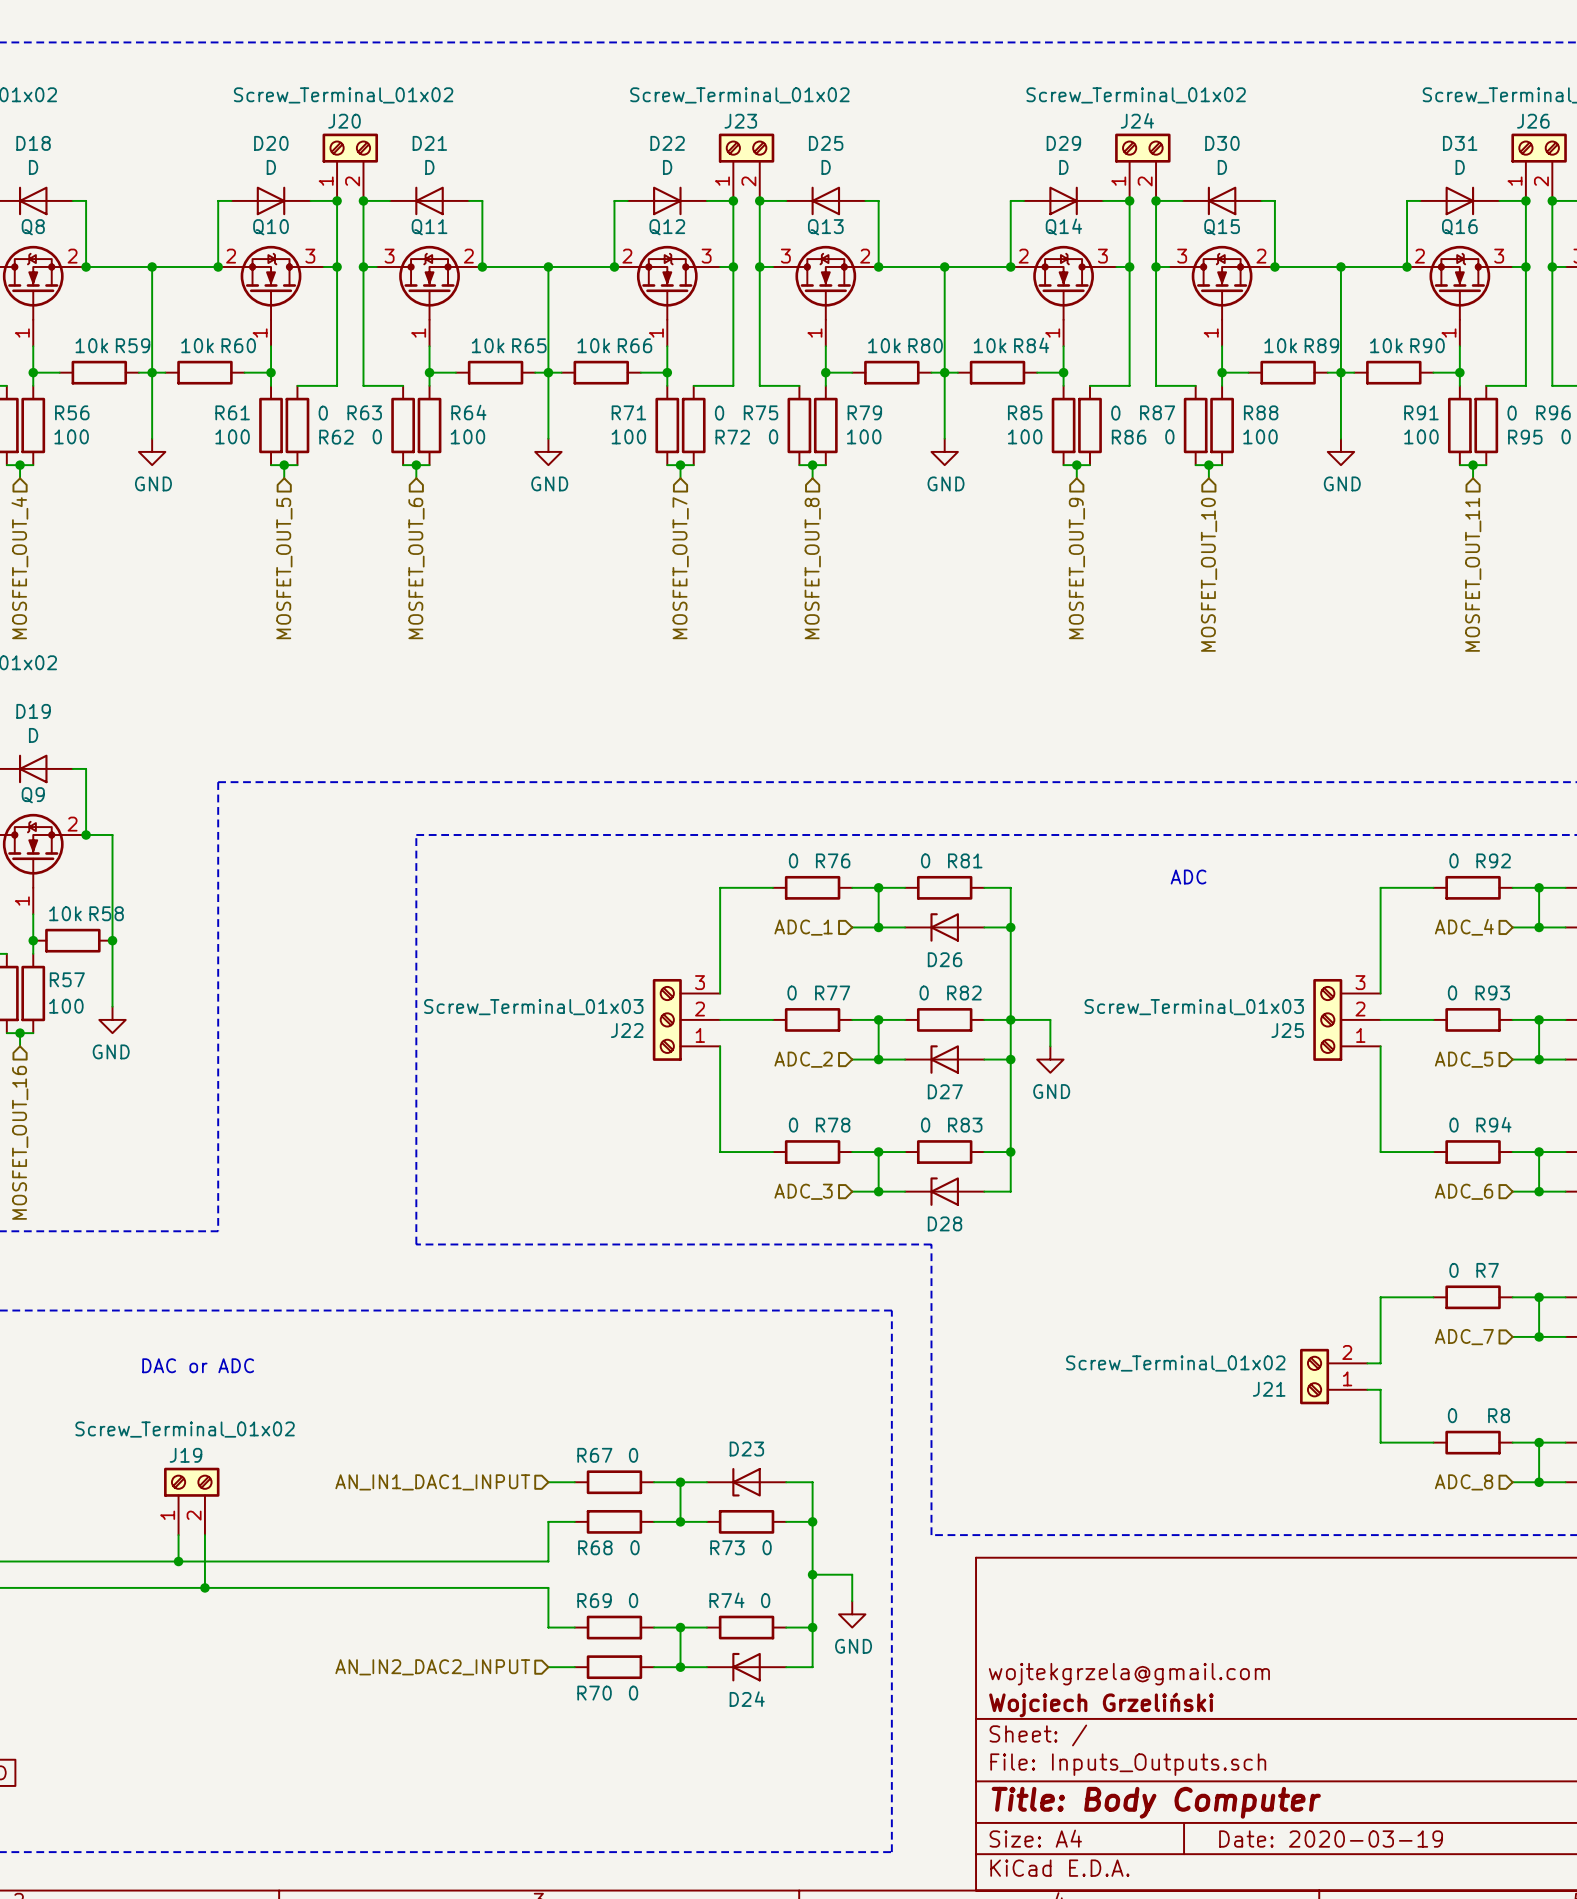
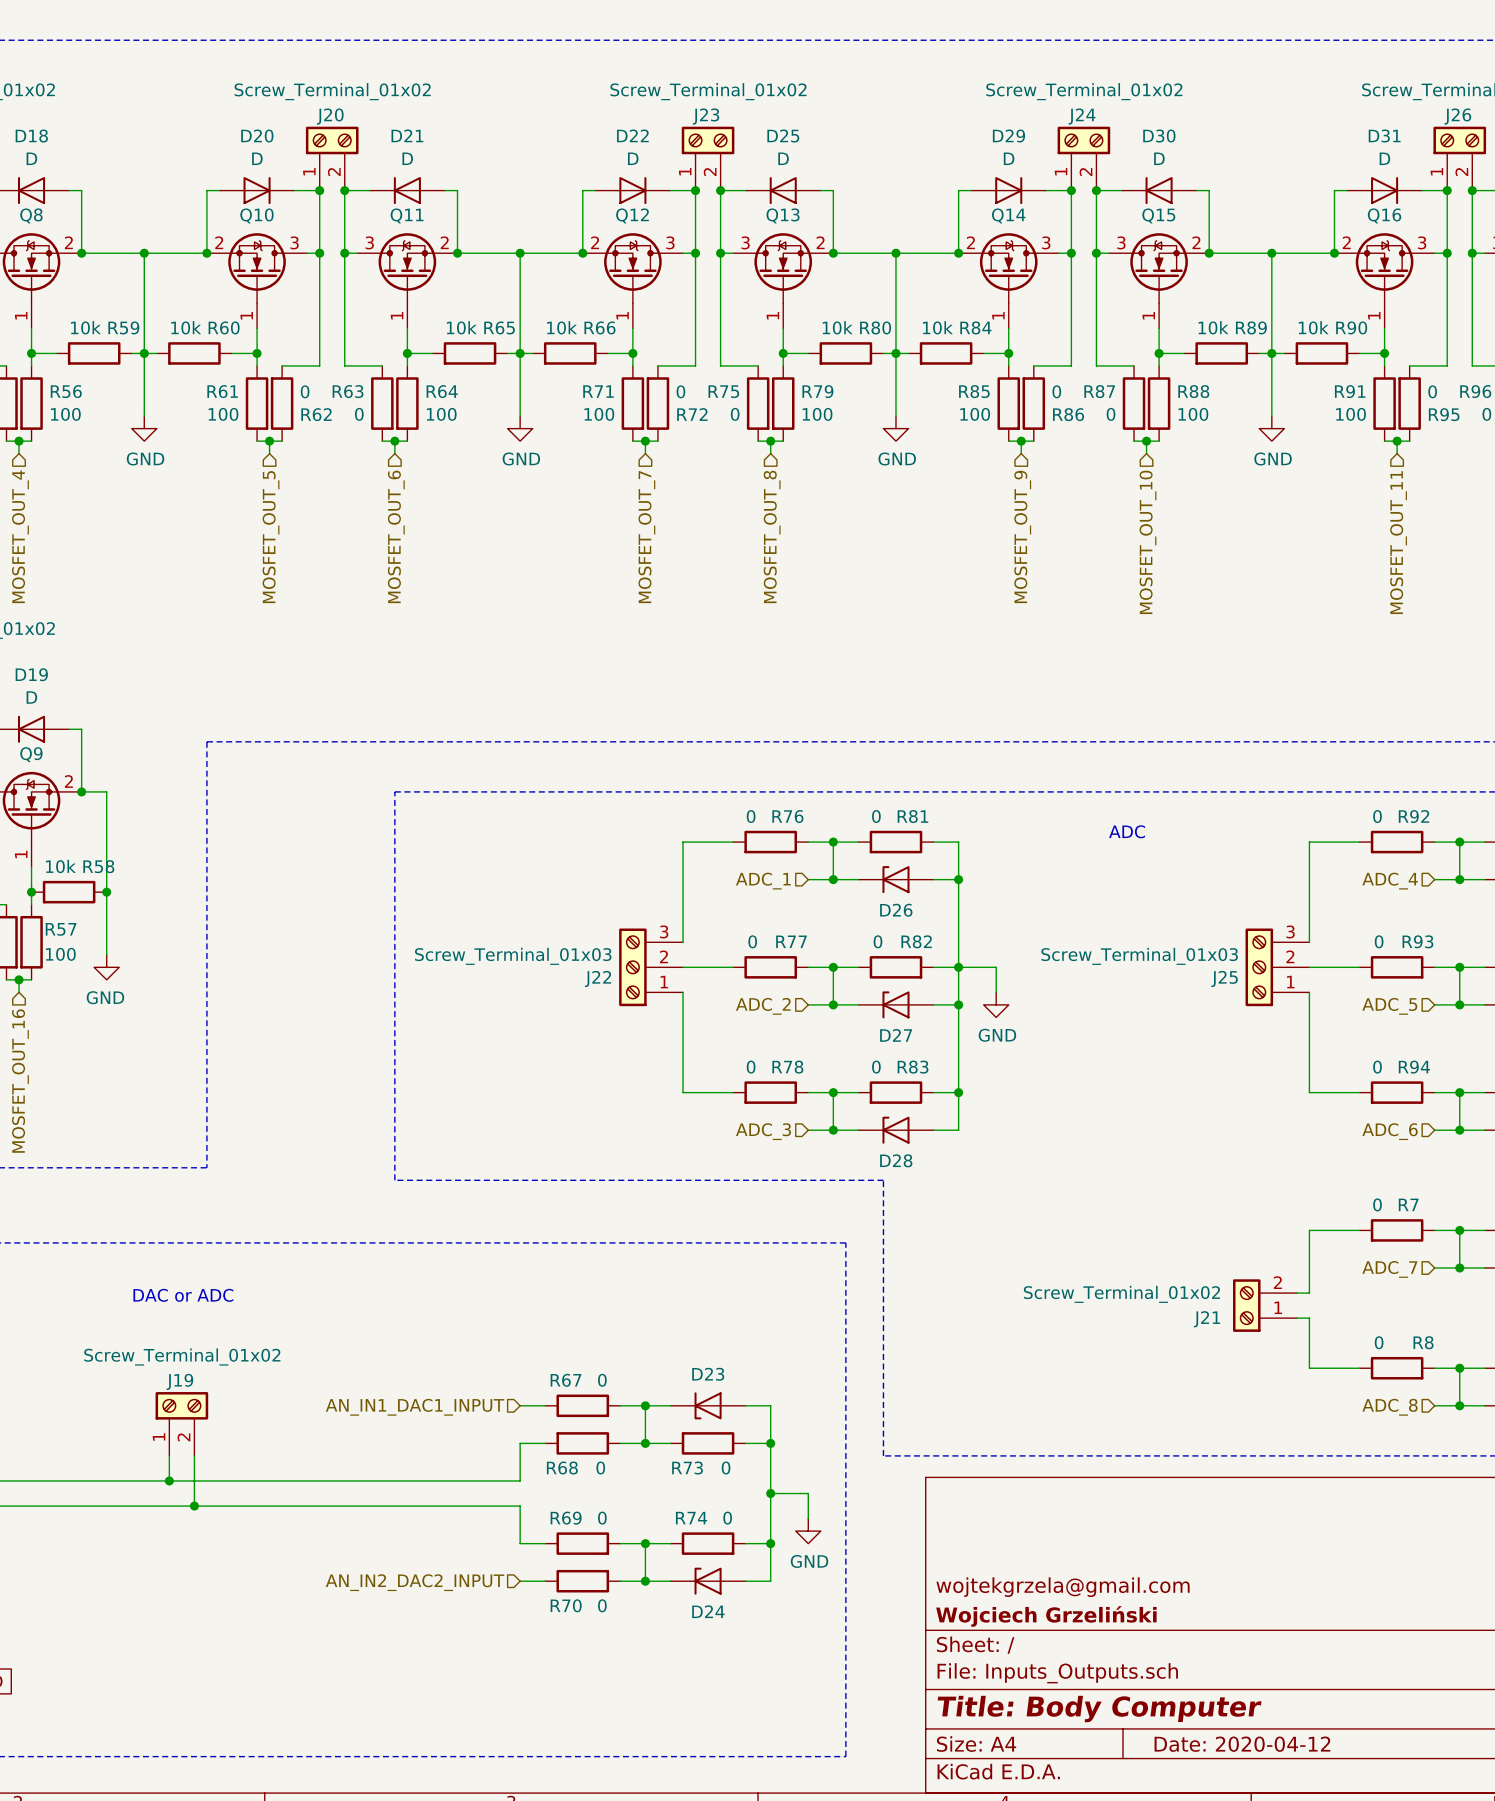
title block: Date: 2020-03-19 (1331, 1839) -> Date: 2020-04-12 (1242, 1744)

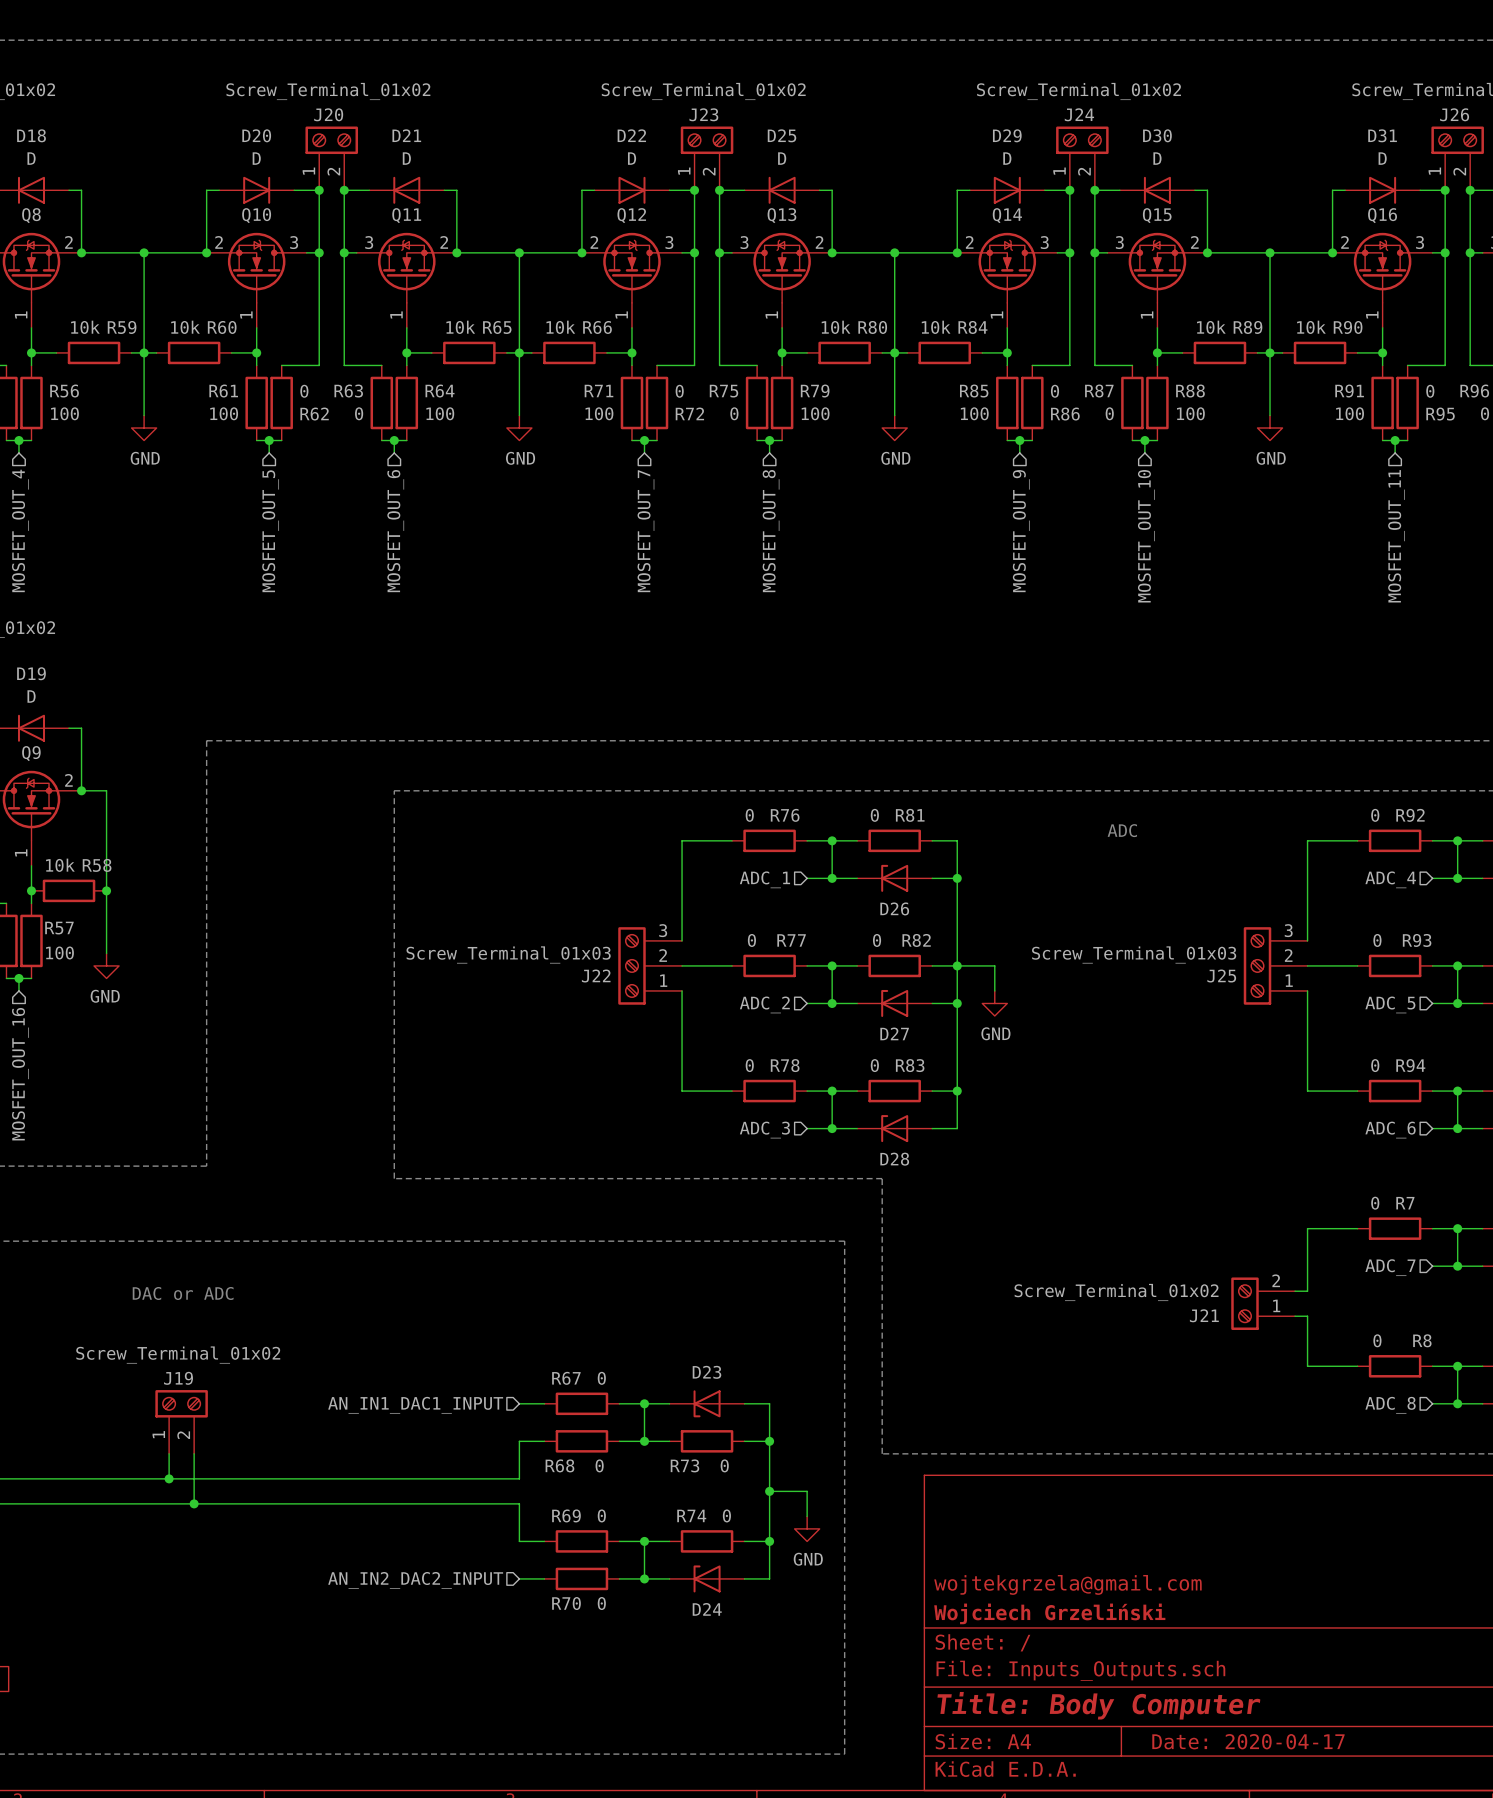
title block: Date: 2020-04-12 (1242, 1744) -> Date: 2020-04-17 (1248, 1741)

